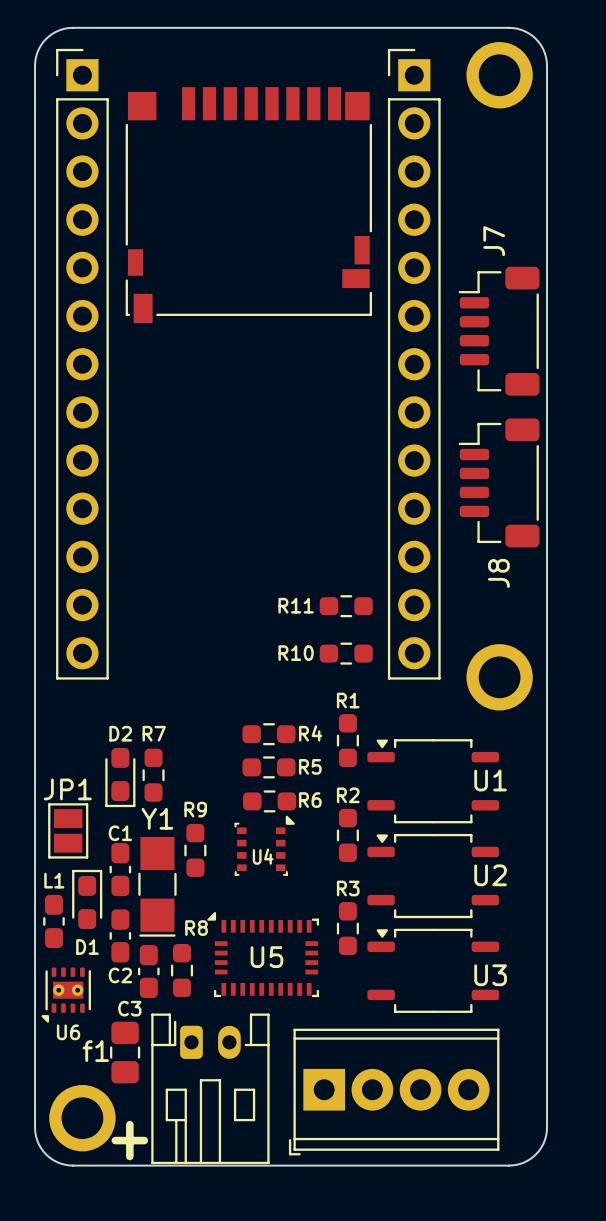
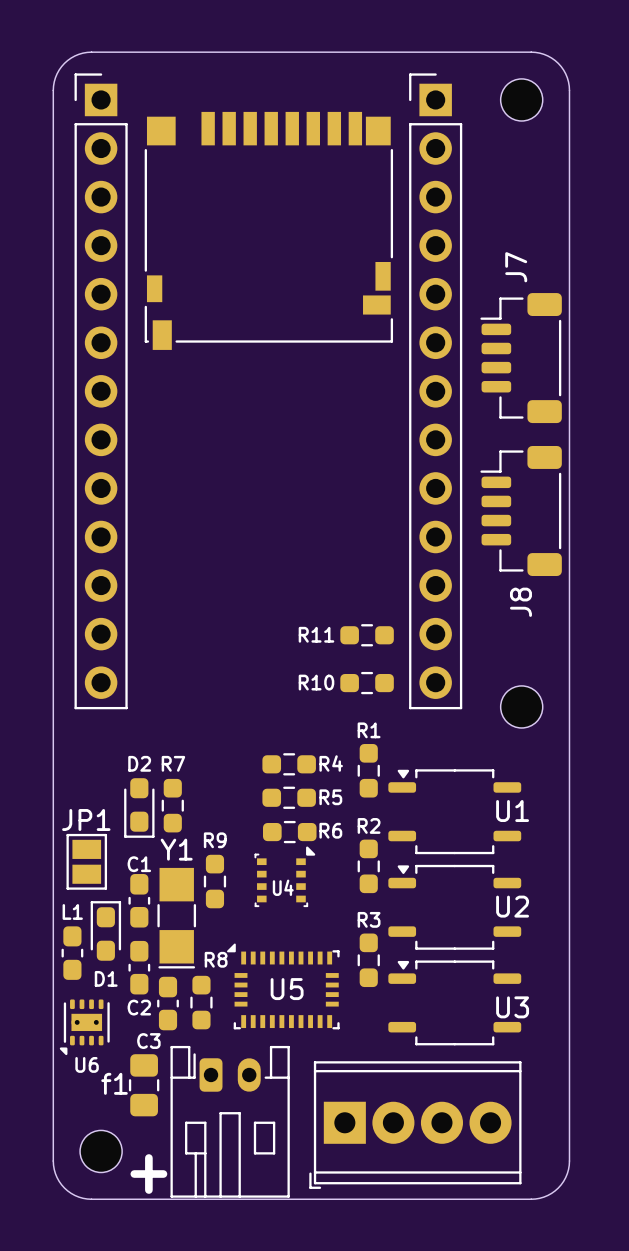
part footprint: [466, 42, 533, 109] -> [500, 78, 543, 121]
part footprint: [466, 644, 533, 711] -> [500, 685, 543, 728]
part footprint: [49, 1085, 116, 1152] -> [80, 1130, 123, 1173]

